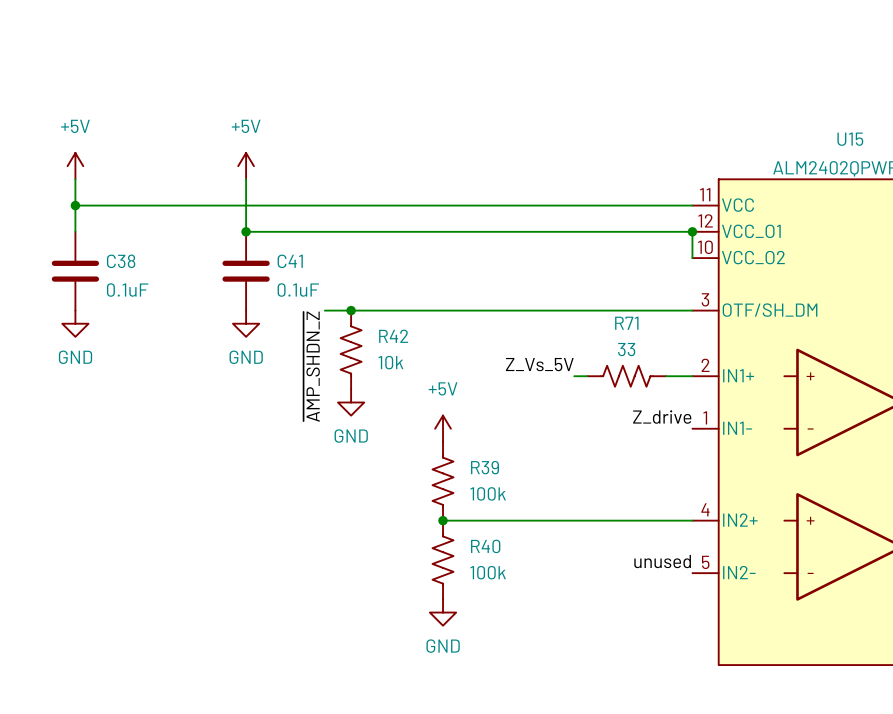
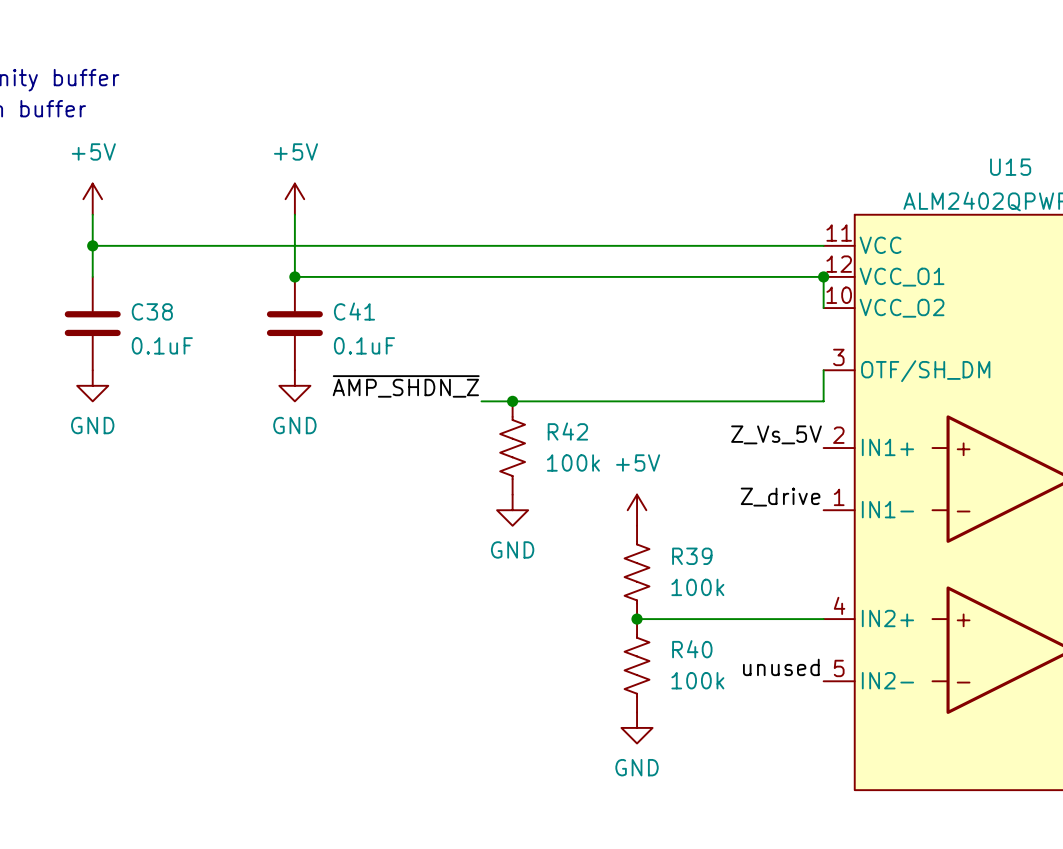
wire: (324, 310) (692, 310) -> (481, 401) (823, 401) (823, 370)
junction: (351, 310) -> none
junction: none -> (512, 401)
R42 position: (351, 349) -> (512, 448)
R42 value: 10k (390, 362) -> 100k (573, 462)
label position: Z_Vs_5V (539, 364) -> Z_Vs_5V (776, 434)
label rotation: 0° (311, 366) -> 90° clockwise (406, 386)
wire: (574, 376) (587, 376) -> none
R71: 33 (626, 376) -> none
wire: (666, 376) (692, 376) -> none
power symbol position: GND (351, 402) -> GND (512, 510)
power symbol position: +5V (443, 428) -> +5V (637, 510)
R39 position: (443, 481) -> (637, 572)
wire: (443, 520) (534, 520) -> none
junction: (443, 520) -> none
junction: none -> (637, 619)
R40 position: (443, 560) -> (637, 665)
power symbol position: GND (443, 612) -> GND (637, 727)

